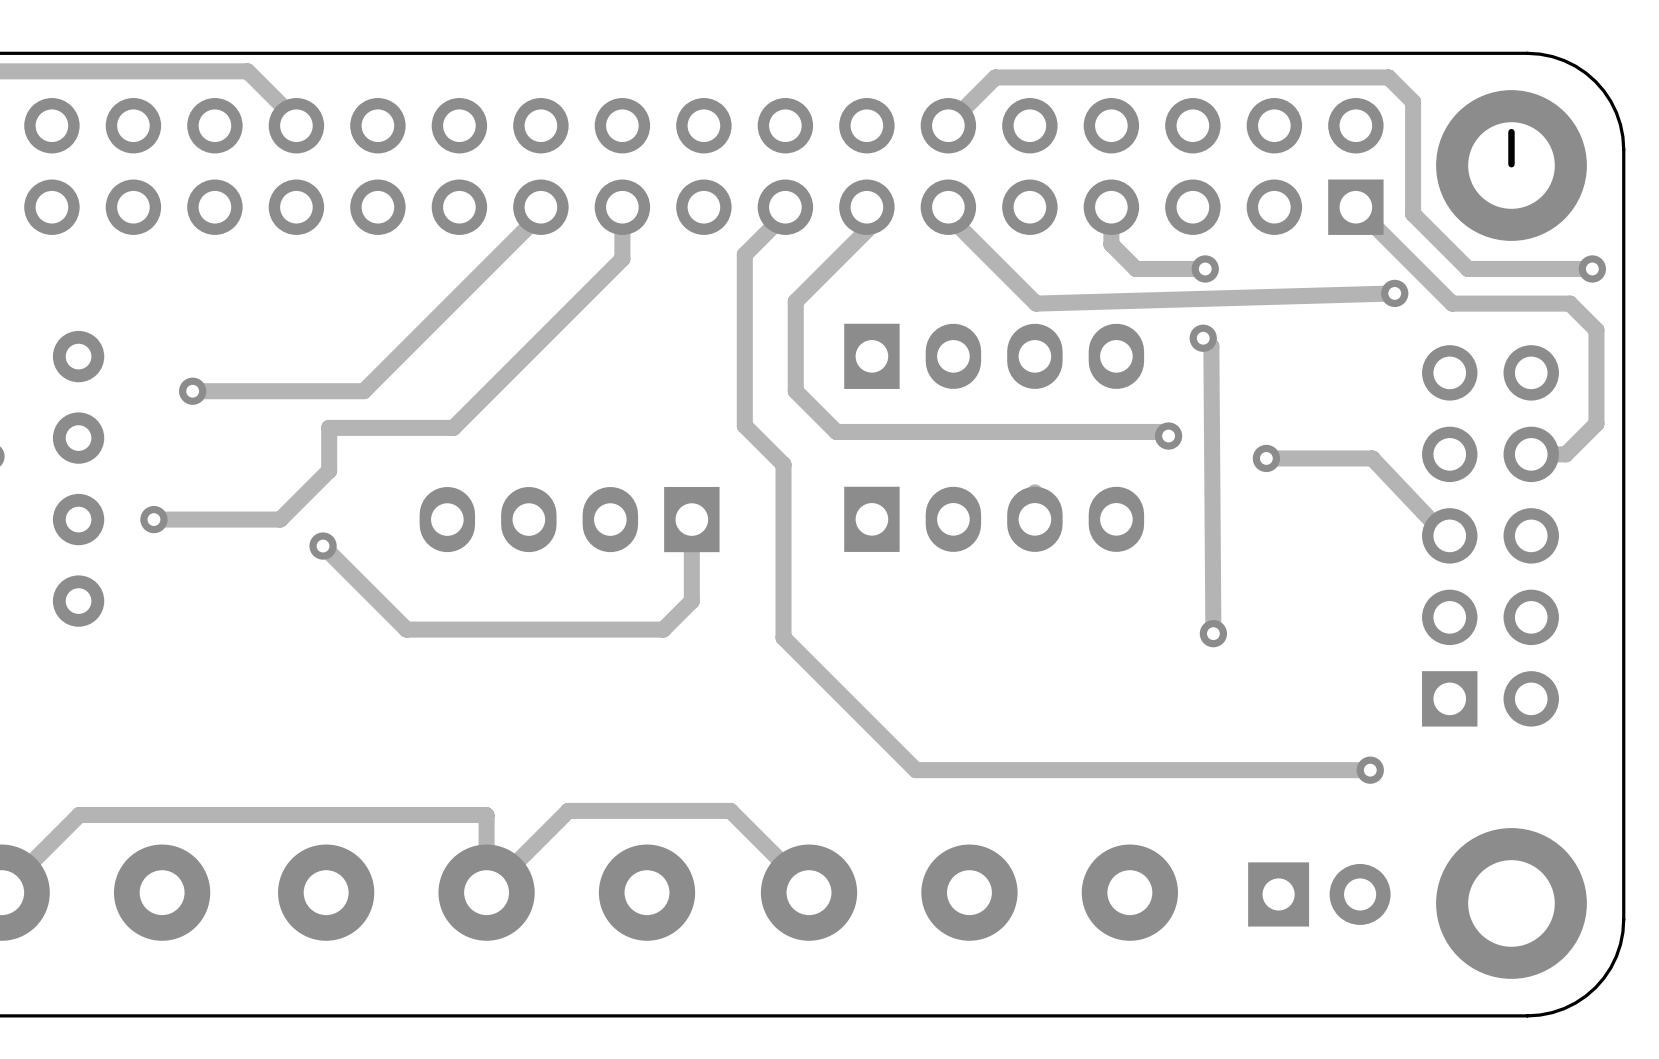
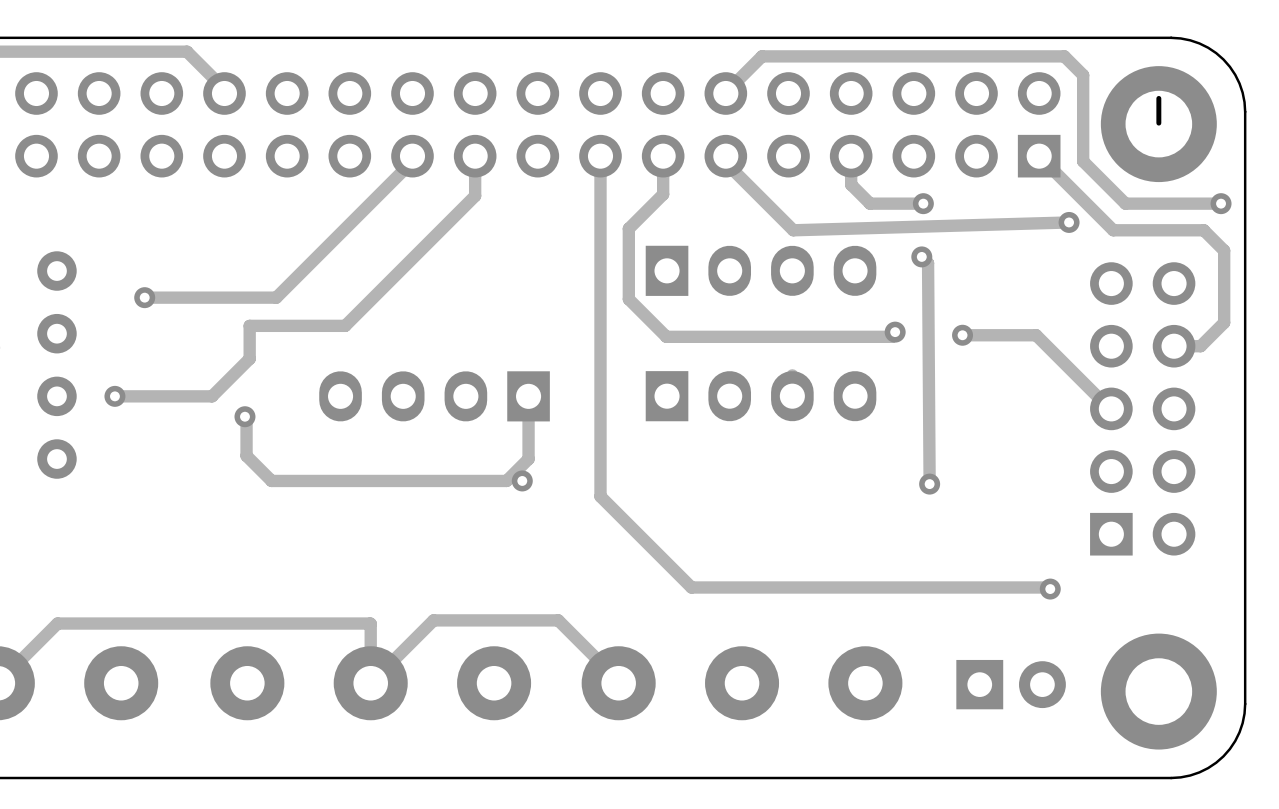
track: (785, 214) (744, 254) (744, 425) (783, 464) (783, 637) (915, 770) (1370, 770) -> (600, 161) (600, 496) (691, 587) (1053, 587)
track: (866, 230) (795, 301) (795, 391) (836, 431) (1164, 431) (1168, 436) -> (663, 174) (663, 194) (628, 228) (628, 299) (666, 336) (892, 336) (893, 335)
track: none -> (962, 335) (1036, 335) (1109, 408)
track: (1266, 458) (1372, 458) (1445, 535) -> none
via position: (1266, 458) -> (962, 335)
track: (323, 546) (406, 629) -> (246, 418) (246, 455) (271, 480) (309, 480)
via: none -> (522, 480)

